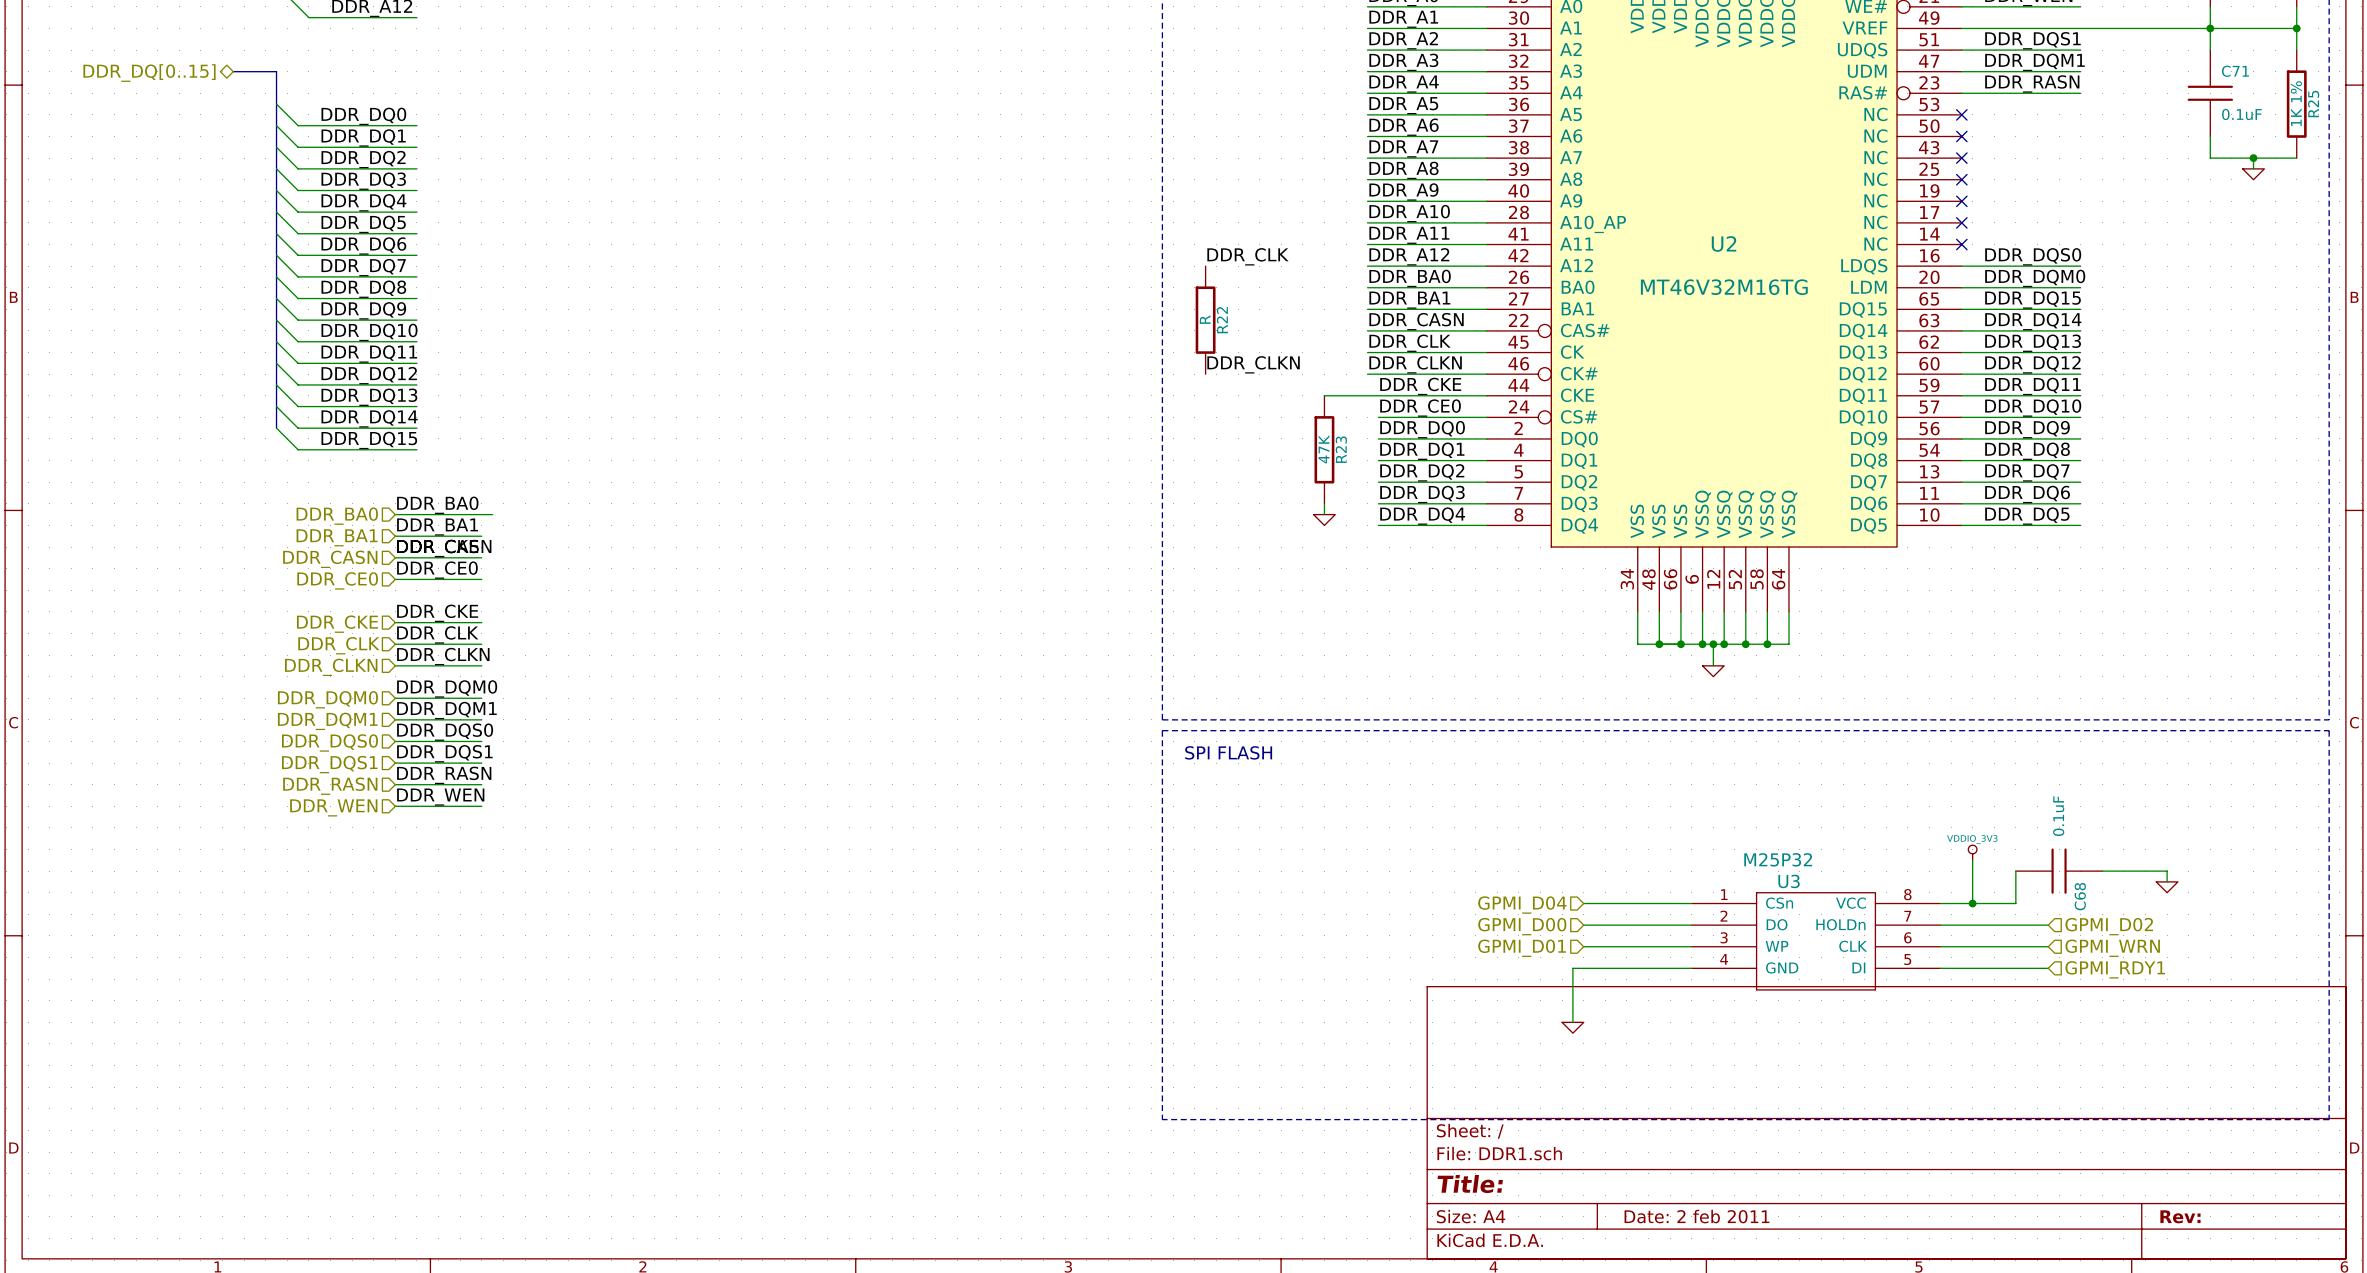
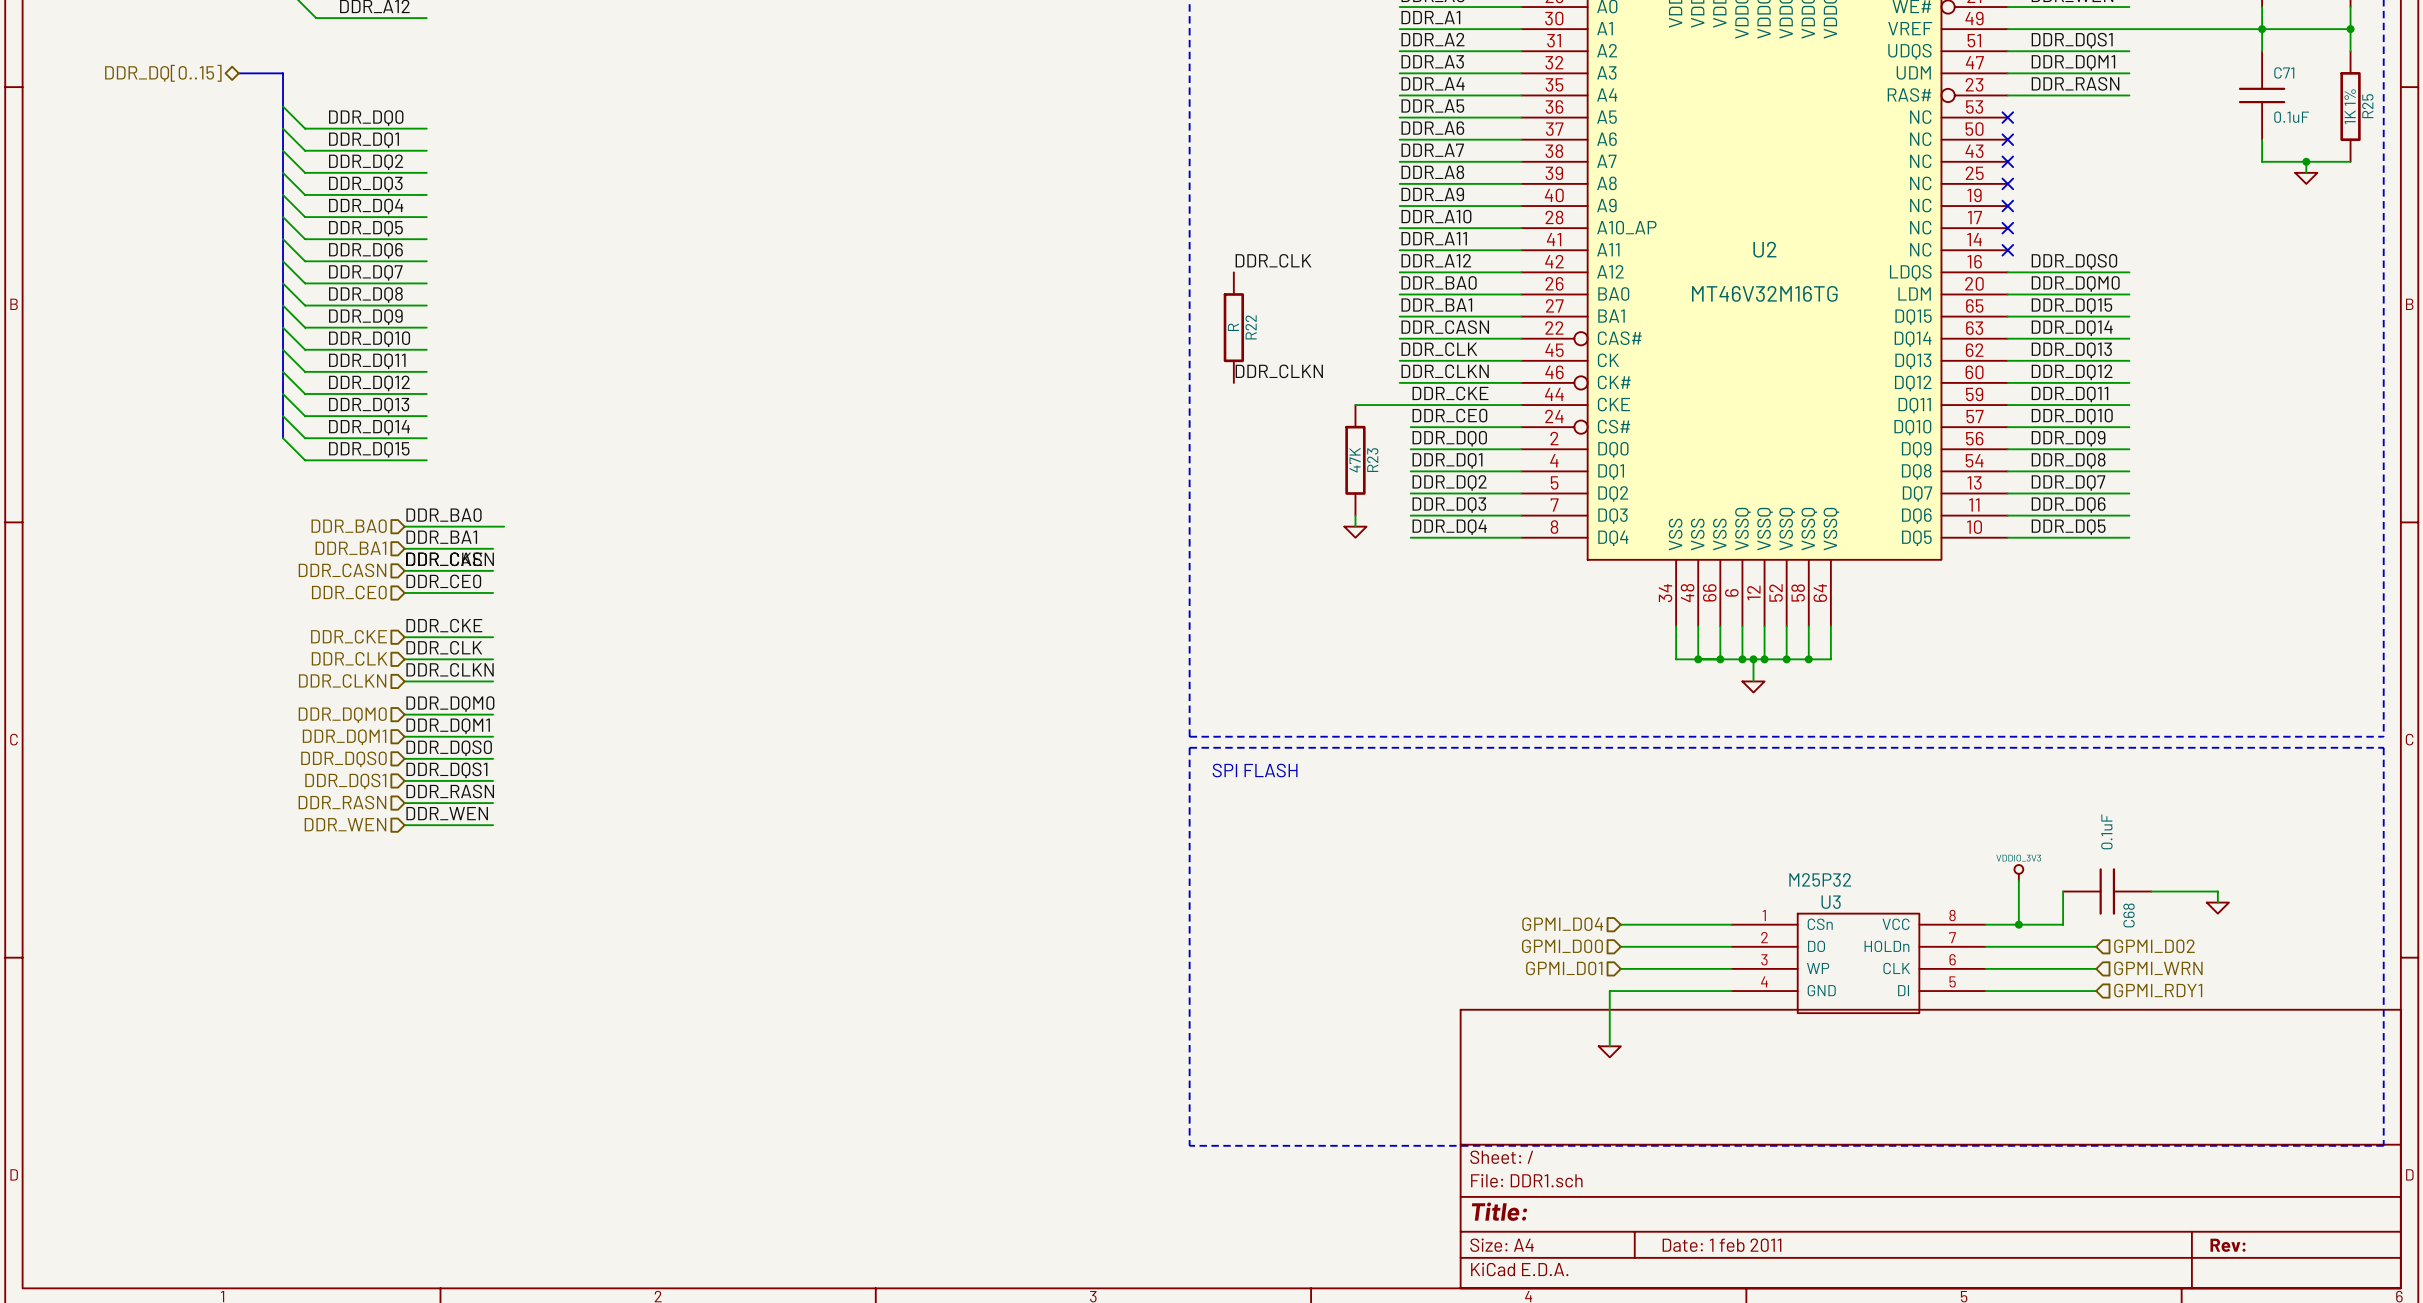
title block: Date: 2 feb 2011 (1696, 1216) -> Date: 1 feb 2011 (1721, 1245)

